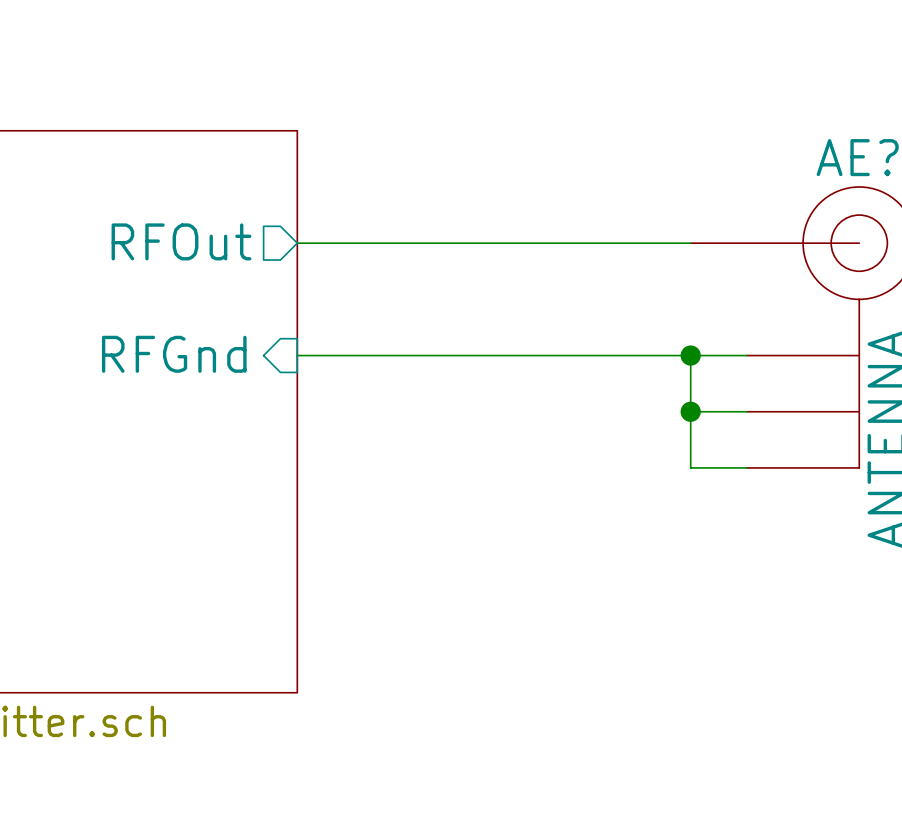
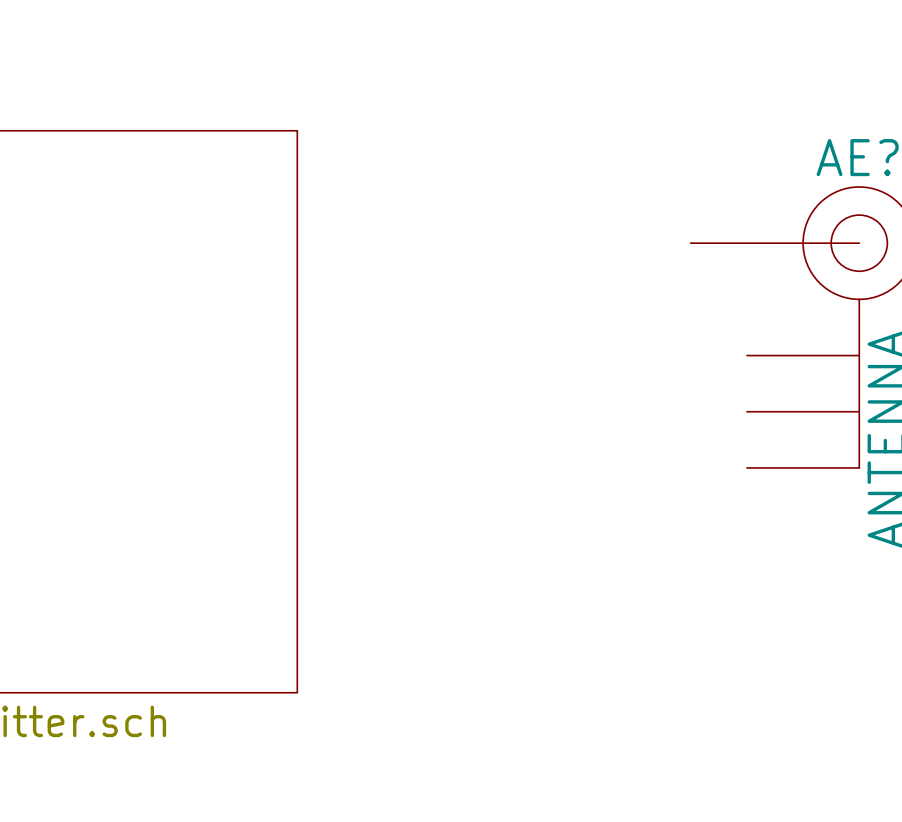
sheet pin: RFOut (181, 241) -> none
wire: (297, 243) (690, 243) -> none
sheet pin: RFGnd (174, 354) -> none
wire: (297, 355) (746, 355) -> none
wire: (690, 355) (690, 467) (746, 467) -> none
junction: (690, 355) -> none
wire: (690, 411) (746, 411) -> none
junction: (690, 411) -> none

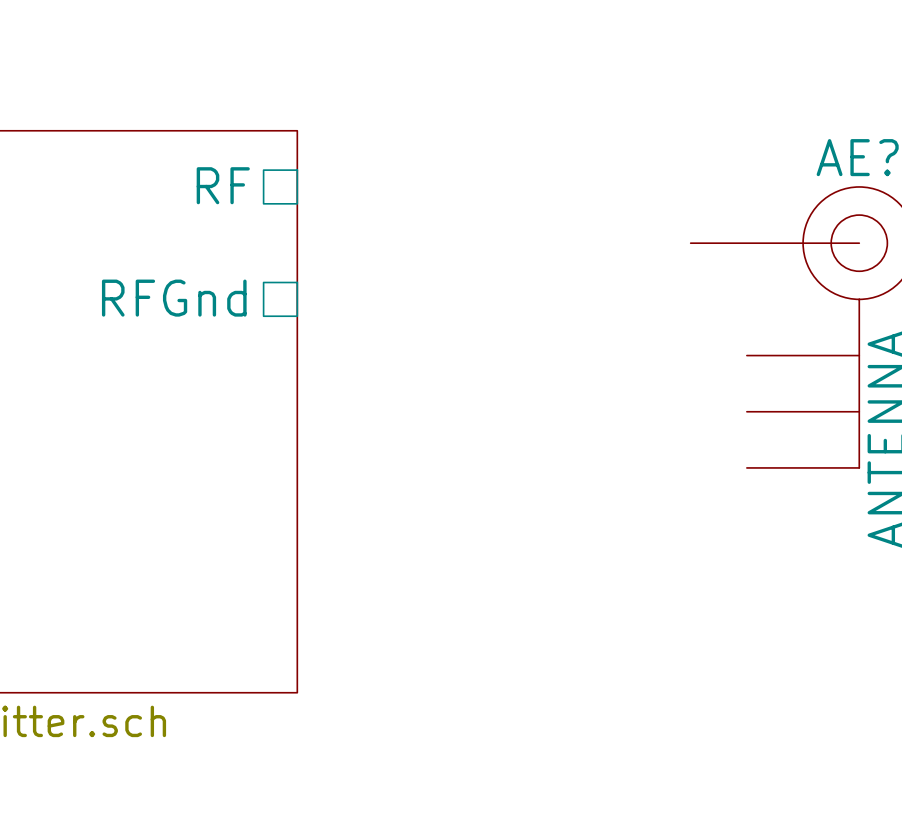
sheet pin: none -> RF (223, 185)
sheet pin: none -> RFGnd (174, 298)

